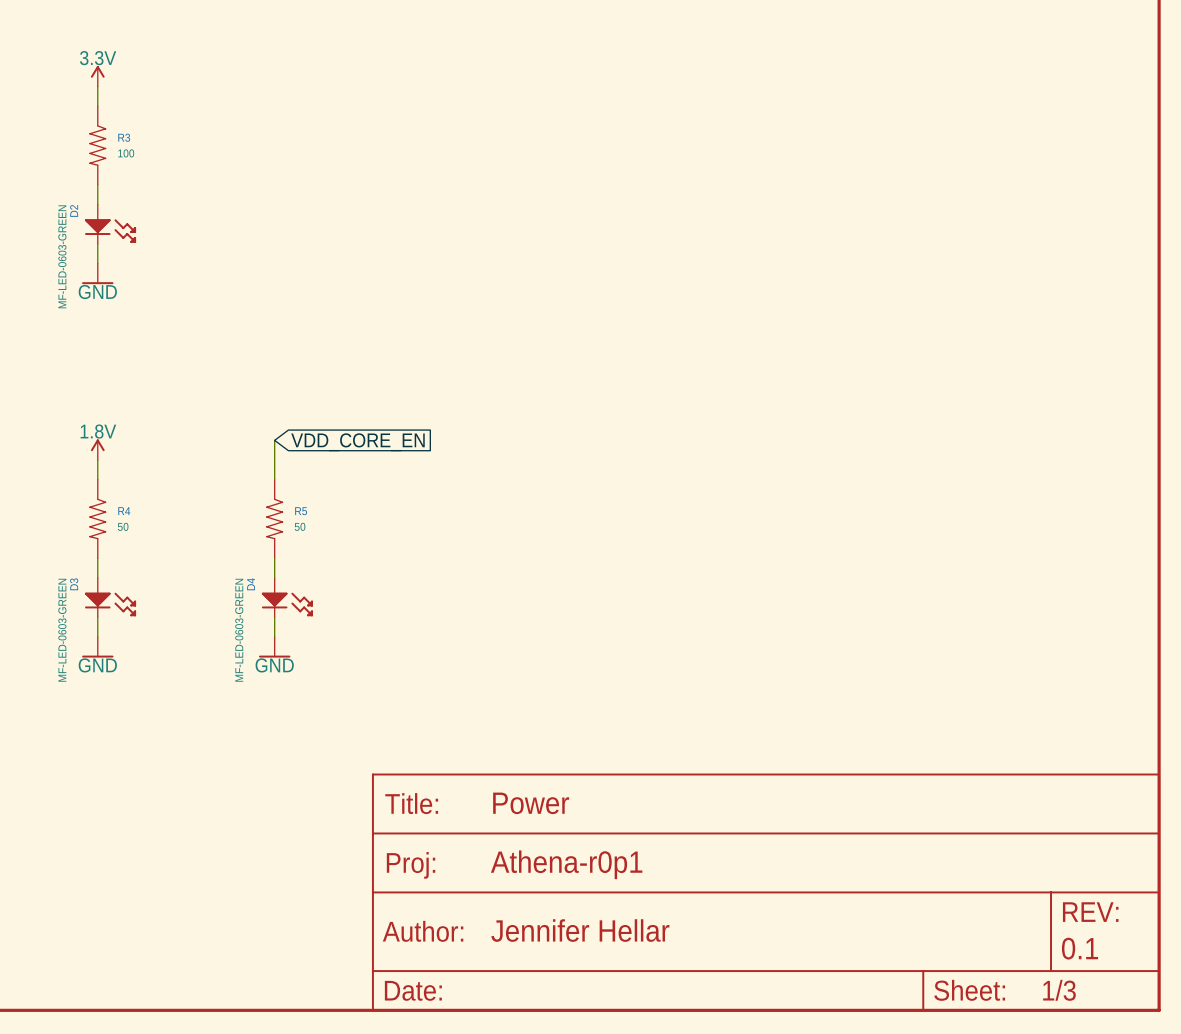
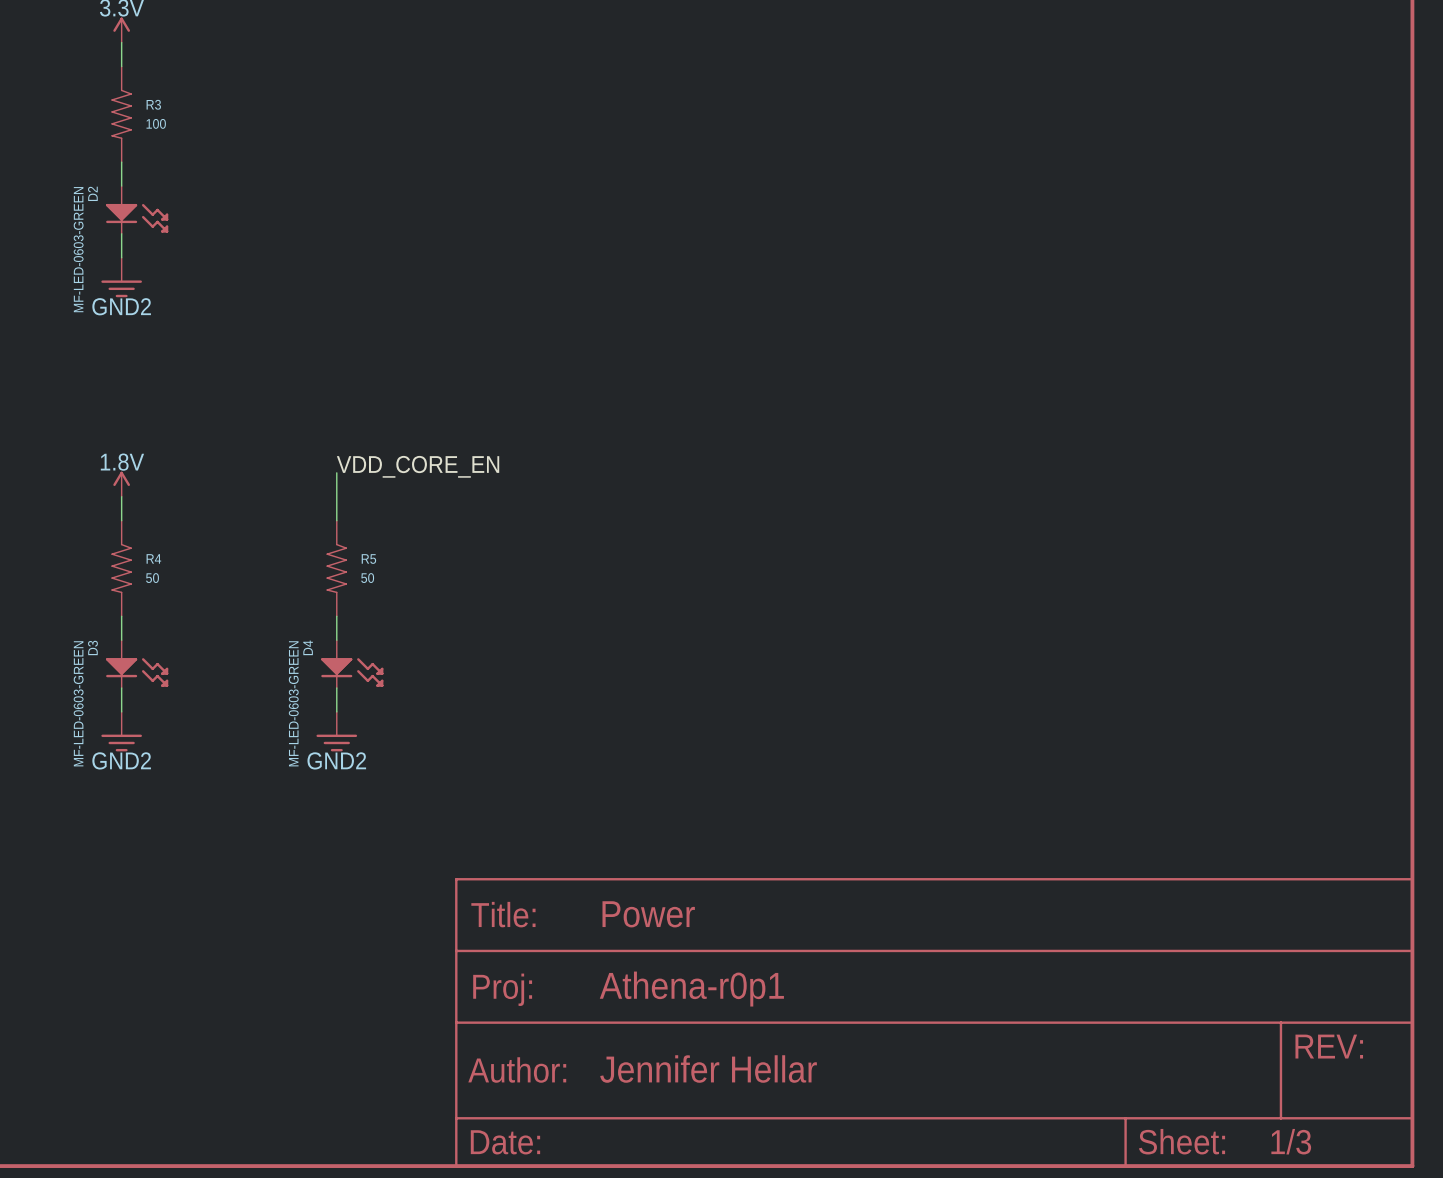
power symbol: GND (97, 273) -> GND2 (121, 277)
label: none -> VDD_CORE_EN (418, 466)
global label: VDD_CORE_EN (357, 442) -> none
power symbol: GND (97, 647) -> GND2 (121, 731)
power symbol: GND (274, 647) -> GND2 (336, 731)
part text: 0.1 (1080, 948) -> none

